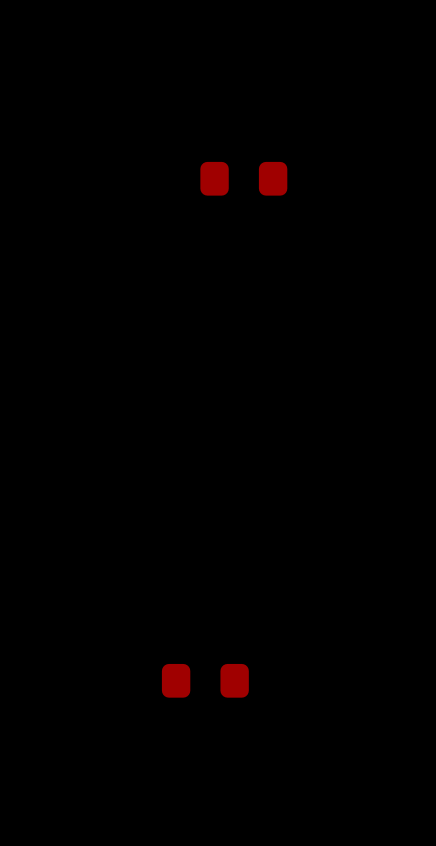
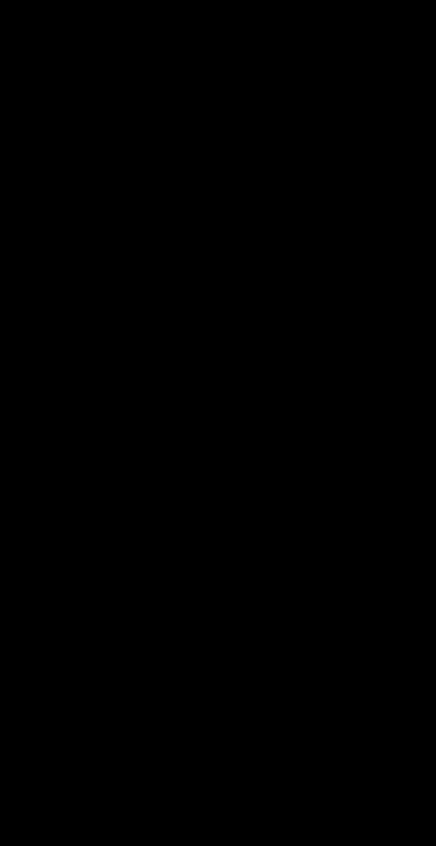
part: (243, 178) -> none
part: (205, 680) -> none

